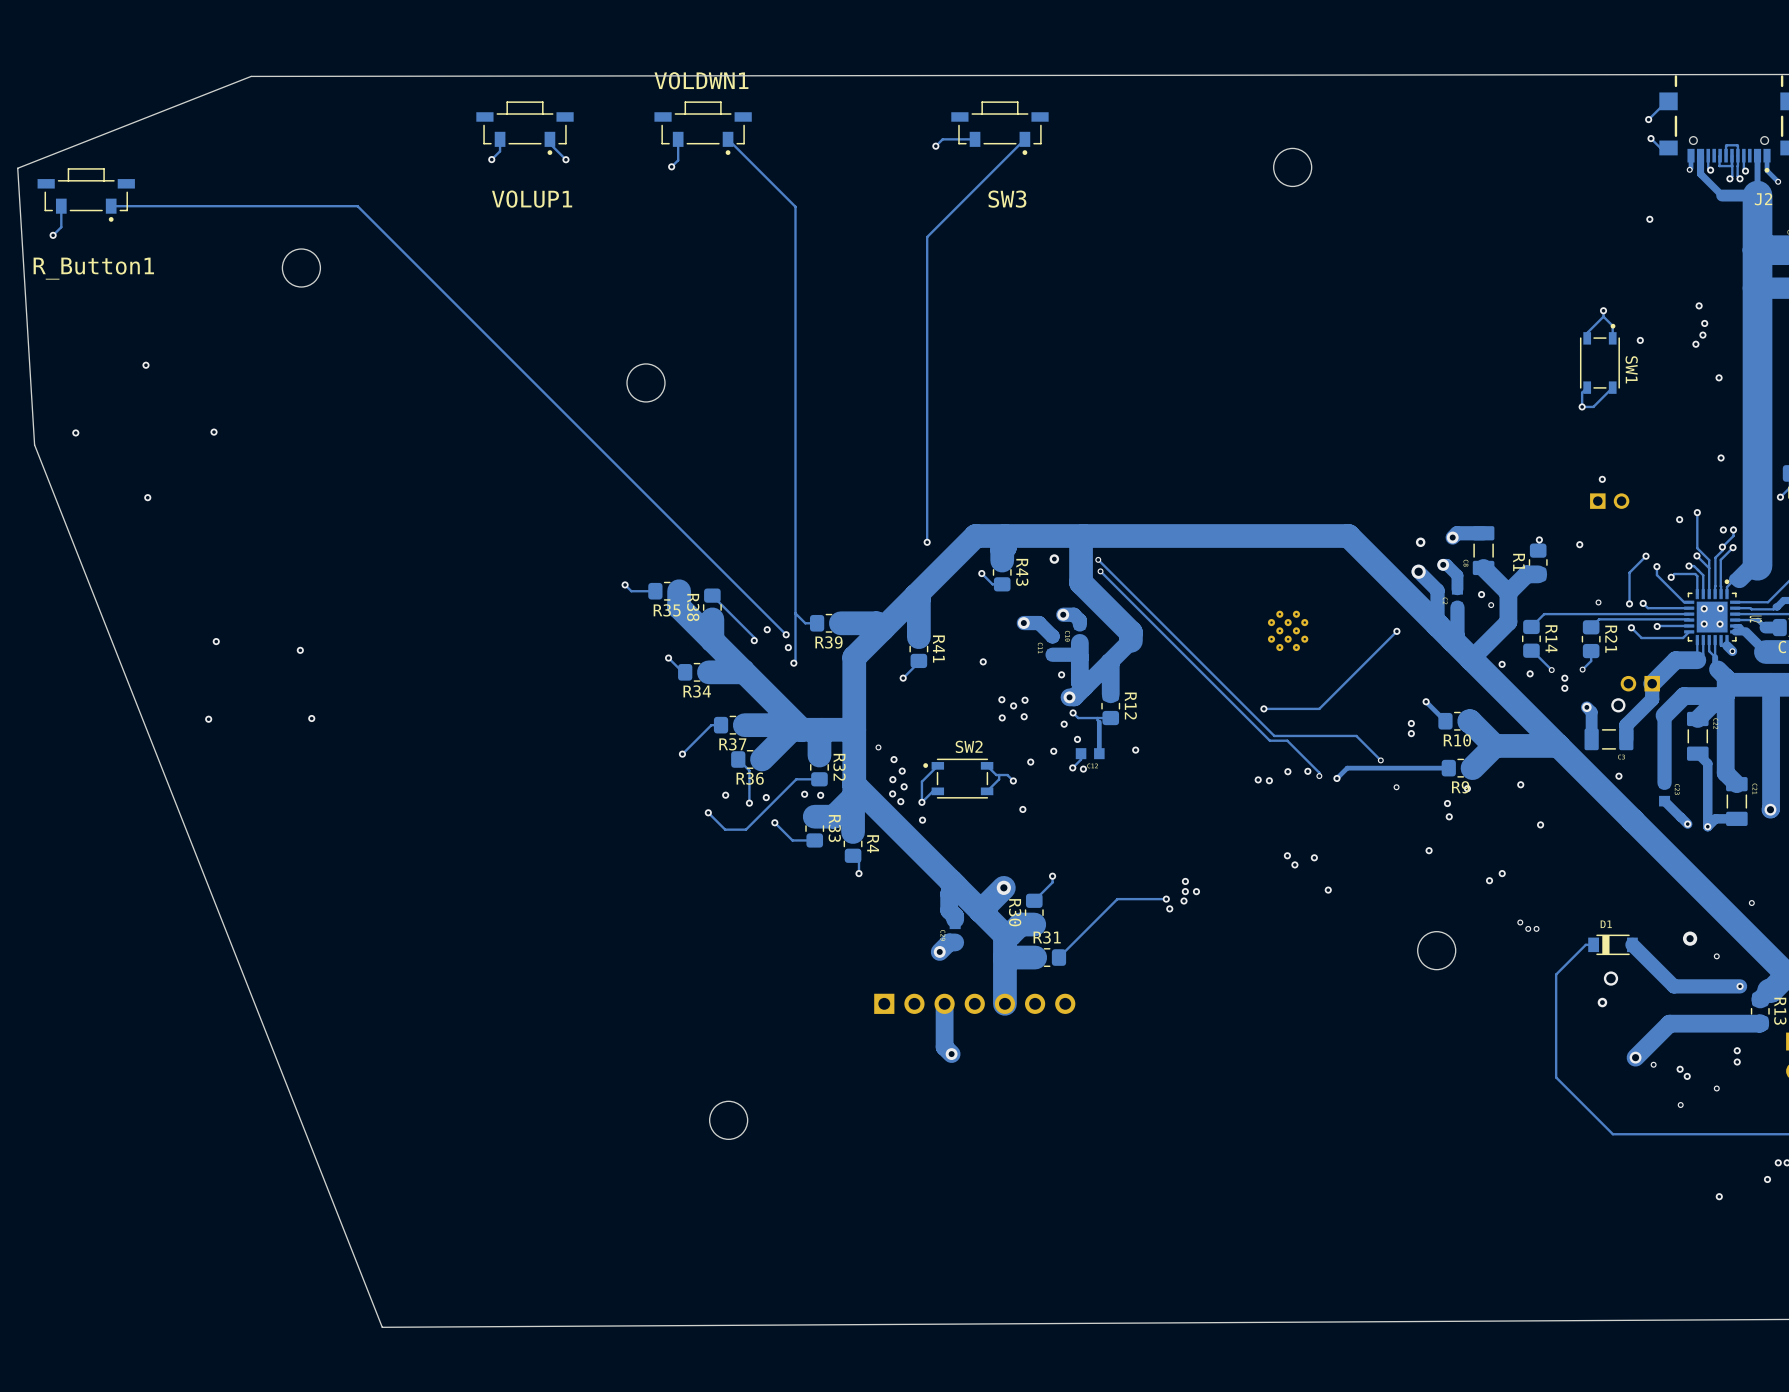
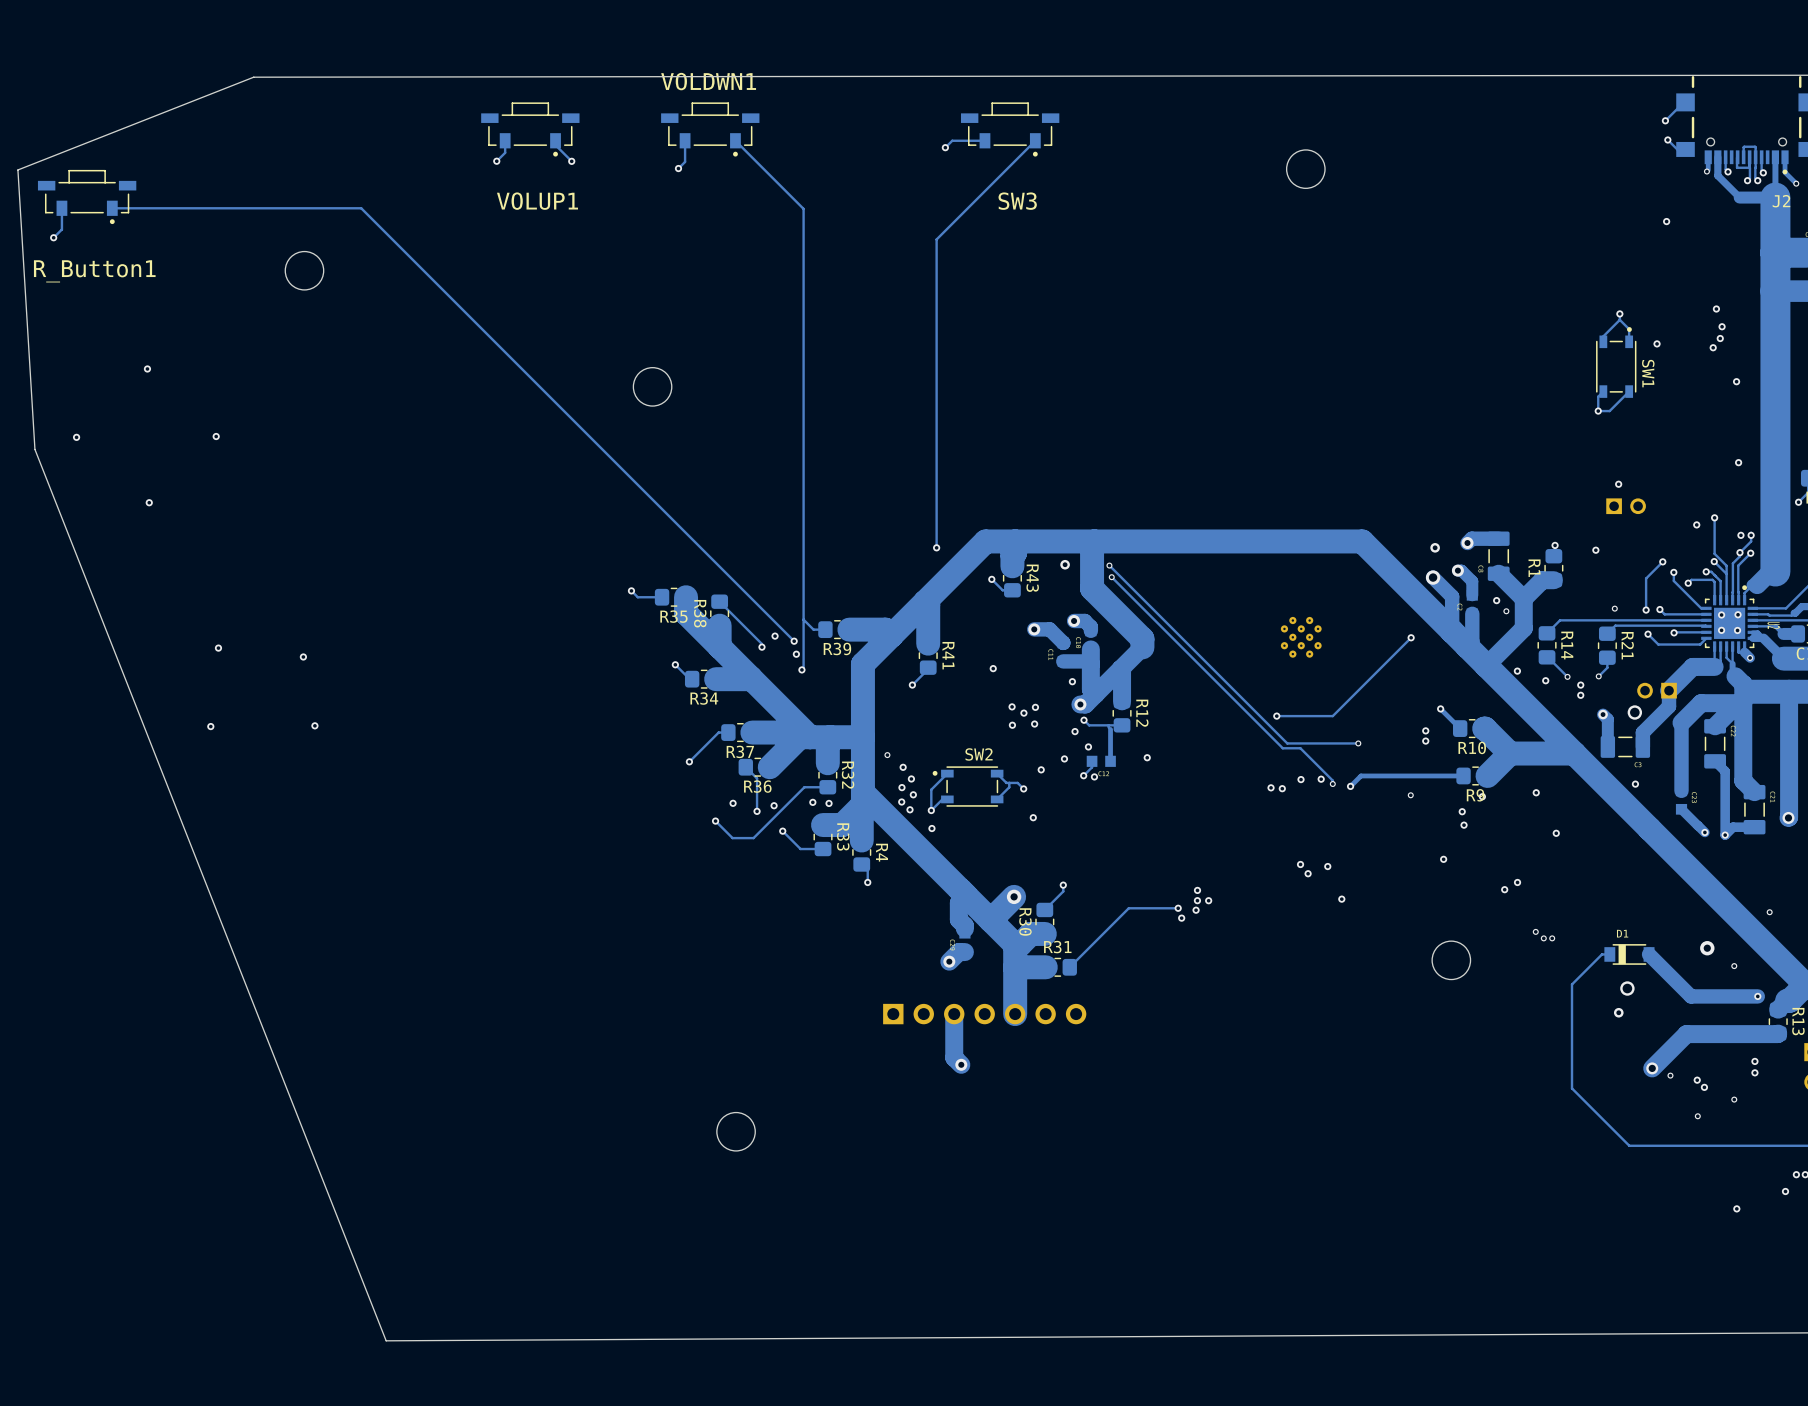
track: (1344, 735) (1356, 735) (1380, 760) -> none
via position: (1380, 760) -> (1358, 743)

